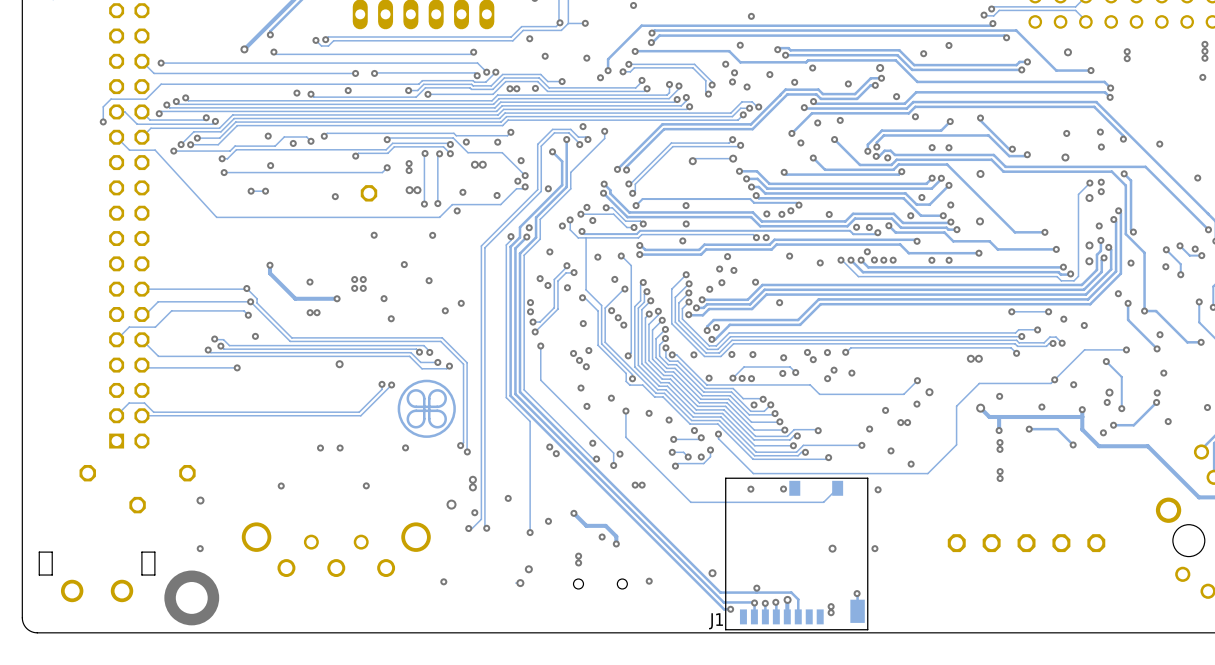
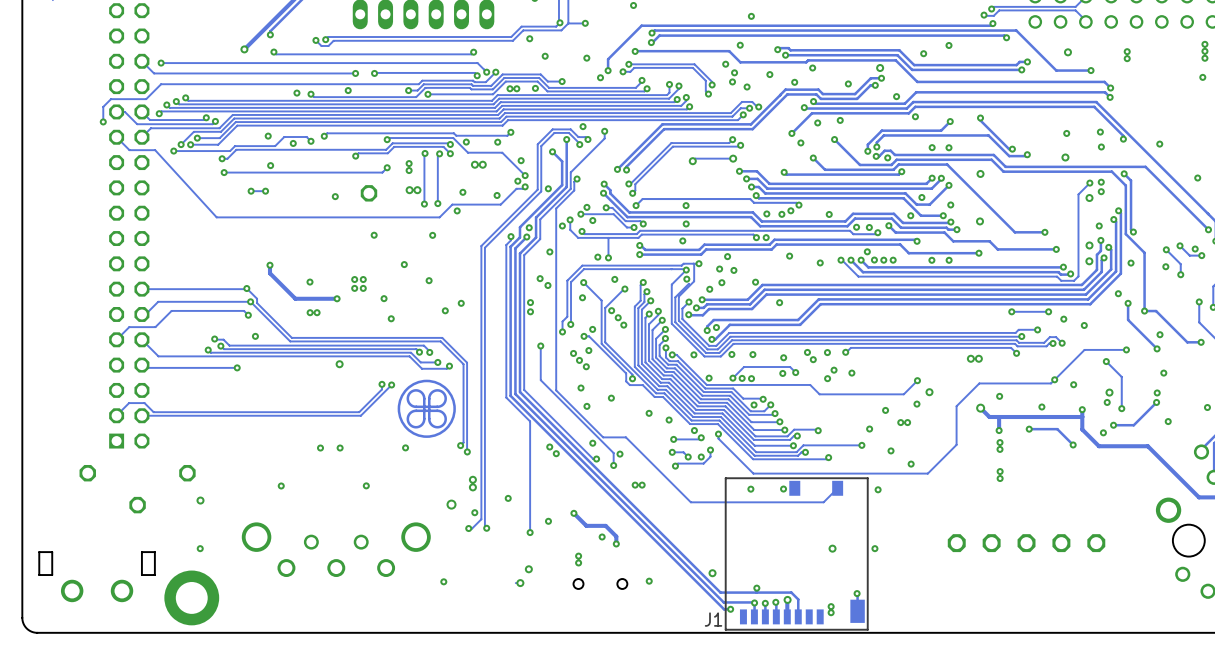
via: none -> (577, 179)
track: (586, 237) (586, 289) (601, 305) -> (583, 282) (601, 300) (601, 305)
track: none -> (608, 237) (608, 257)
track: (621, 255) (631, 265) (631, 352) (628, 355) -> none
via position: (621, 255) -> (608, 257)
track: none -> (698, 263) (683, 263) (681, 265) (582, 265) (567, 280) (567, 316) (562, 321) (562, 331)
via: none -> (698, 263)
track: (566, 265) (554, 279) (554, 307) (539, 322) (533, 322) -> none
via: (566, 265) -> none
via: none -> (686, 270)
track: (574, 272) (566, 272) (557, 281) (557, 309) (535, 331) -> none
via: (574, 272) -> none
track: (686, 274) (671, 289) -> (570, 324) (571, 282) (584, 269) (685, 269) (671, 284) (671, 289)
via: (686, 274) -> none
via: none -> (686, 279)
via: none -> (583, 282)
via: (689, 283) -> none
via: (567, 287) -> none
track: (688, 292) (678, 302) -> (693, 263) (694, 281) (678, 296) (678, 302)
via: (688, 292) -> none
track: (582, 297) (598, 311) (598, 345) -> (584, 336) (589, 336) (598, 345)
via: (533, 322) -> none
via: (583, 323) -> none
via: none -> (570, 324)
via: none -> (592, 329)
via: (535, 331) -> none
via: none -> (562, 331)
via: none -> (584, 336)
via: (628, 355) -> none
track: (625, 411) (625, 437) -> (577, 179) (574, 181) (574, 190) (556, 208) (556, 390) (603, 437) (625, 437)
via: (625, 411) -> none

